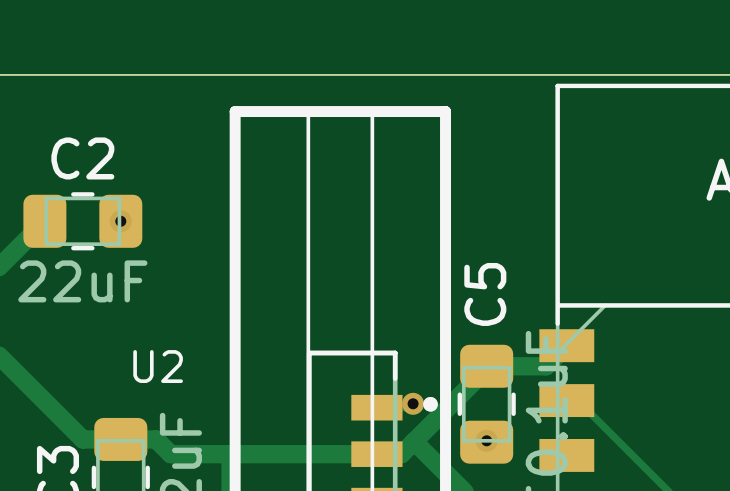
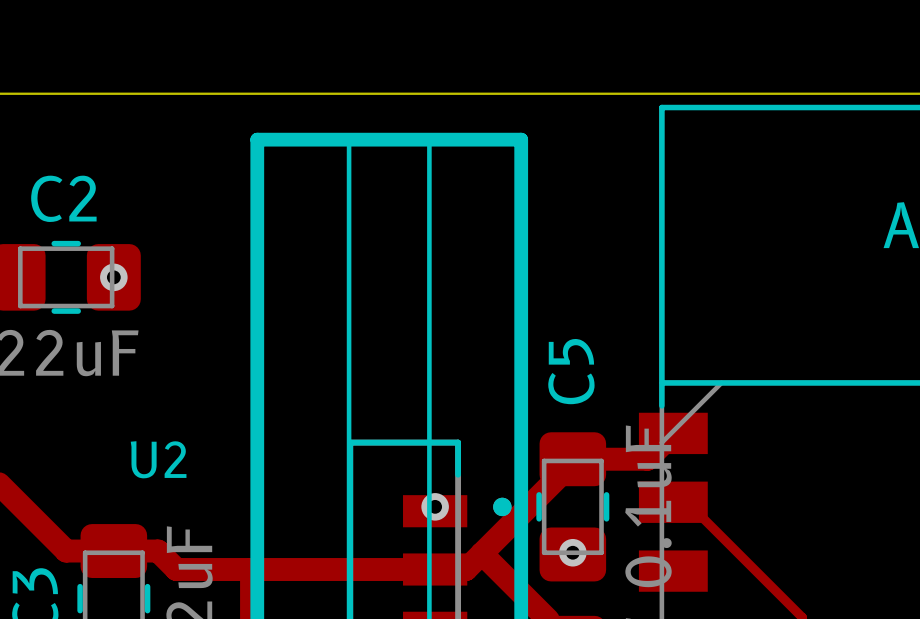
via position: (413, 403) -> (435, 506)

